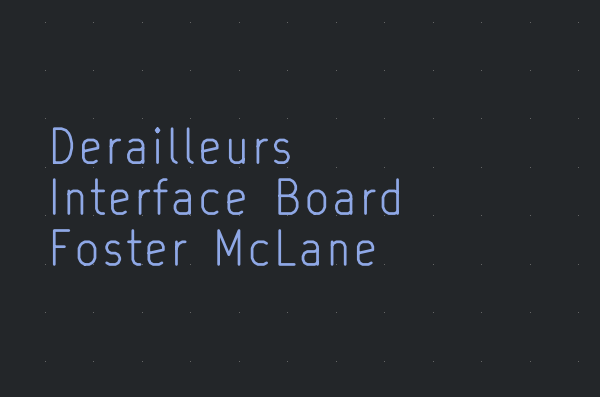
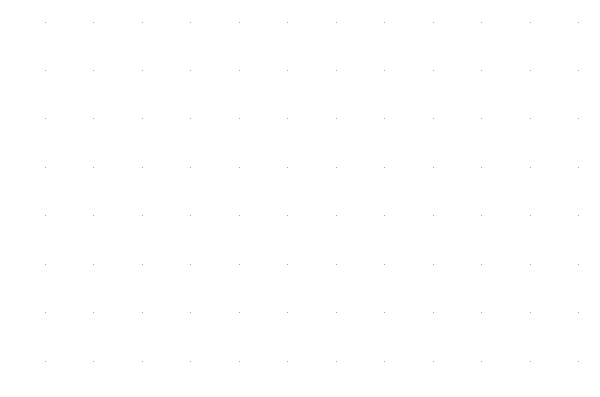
text: Derailleurs (171, 145) -> none
text: Interface Board (225, 196) -> none
text: Foster McLane (213, 247) -> none

